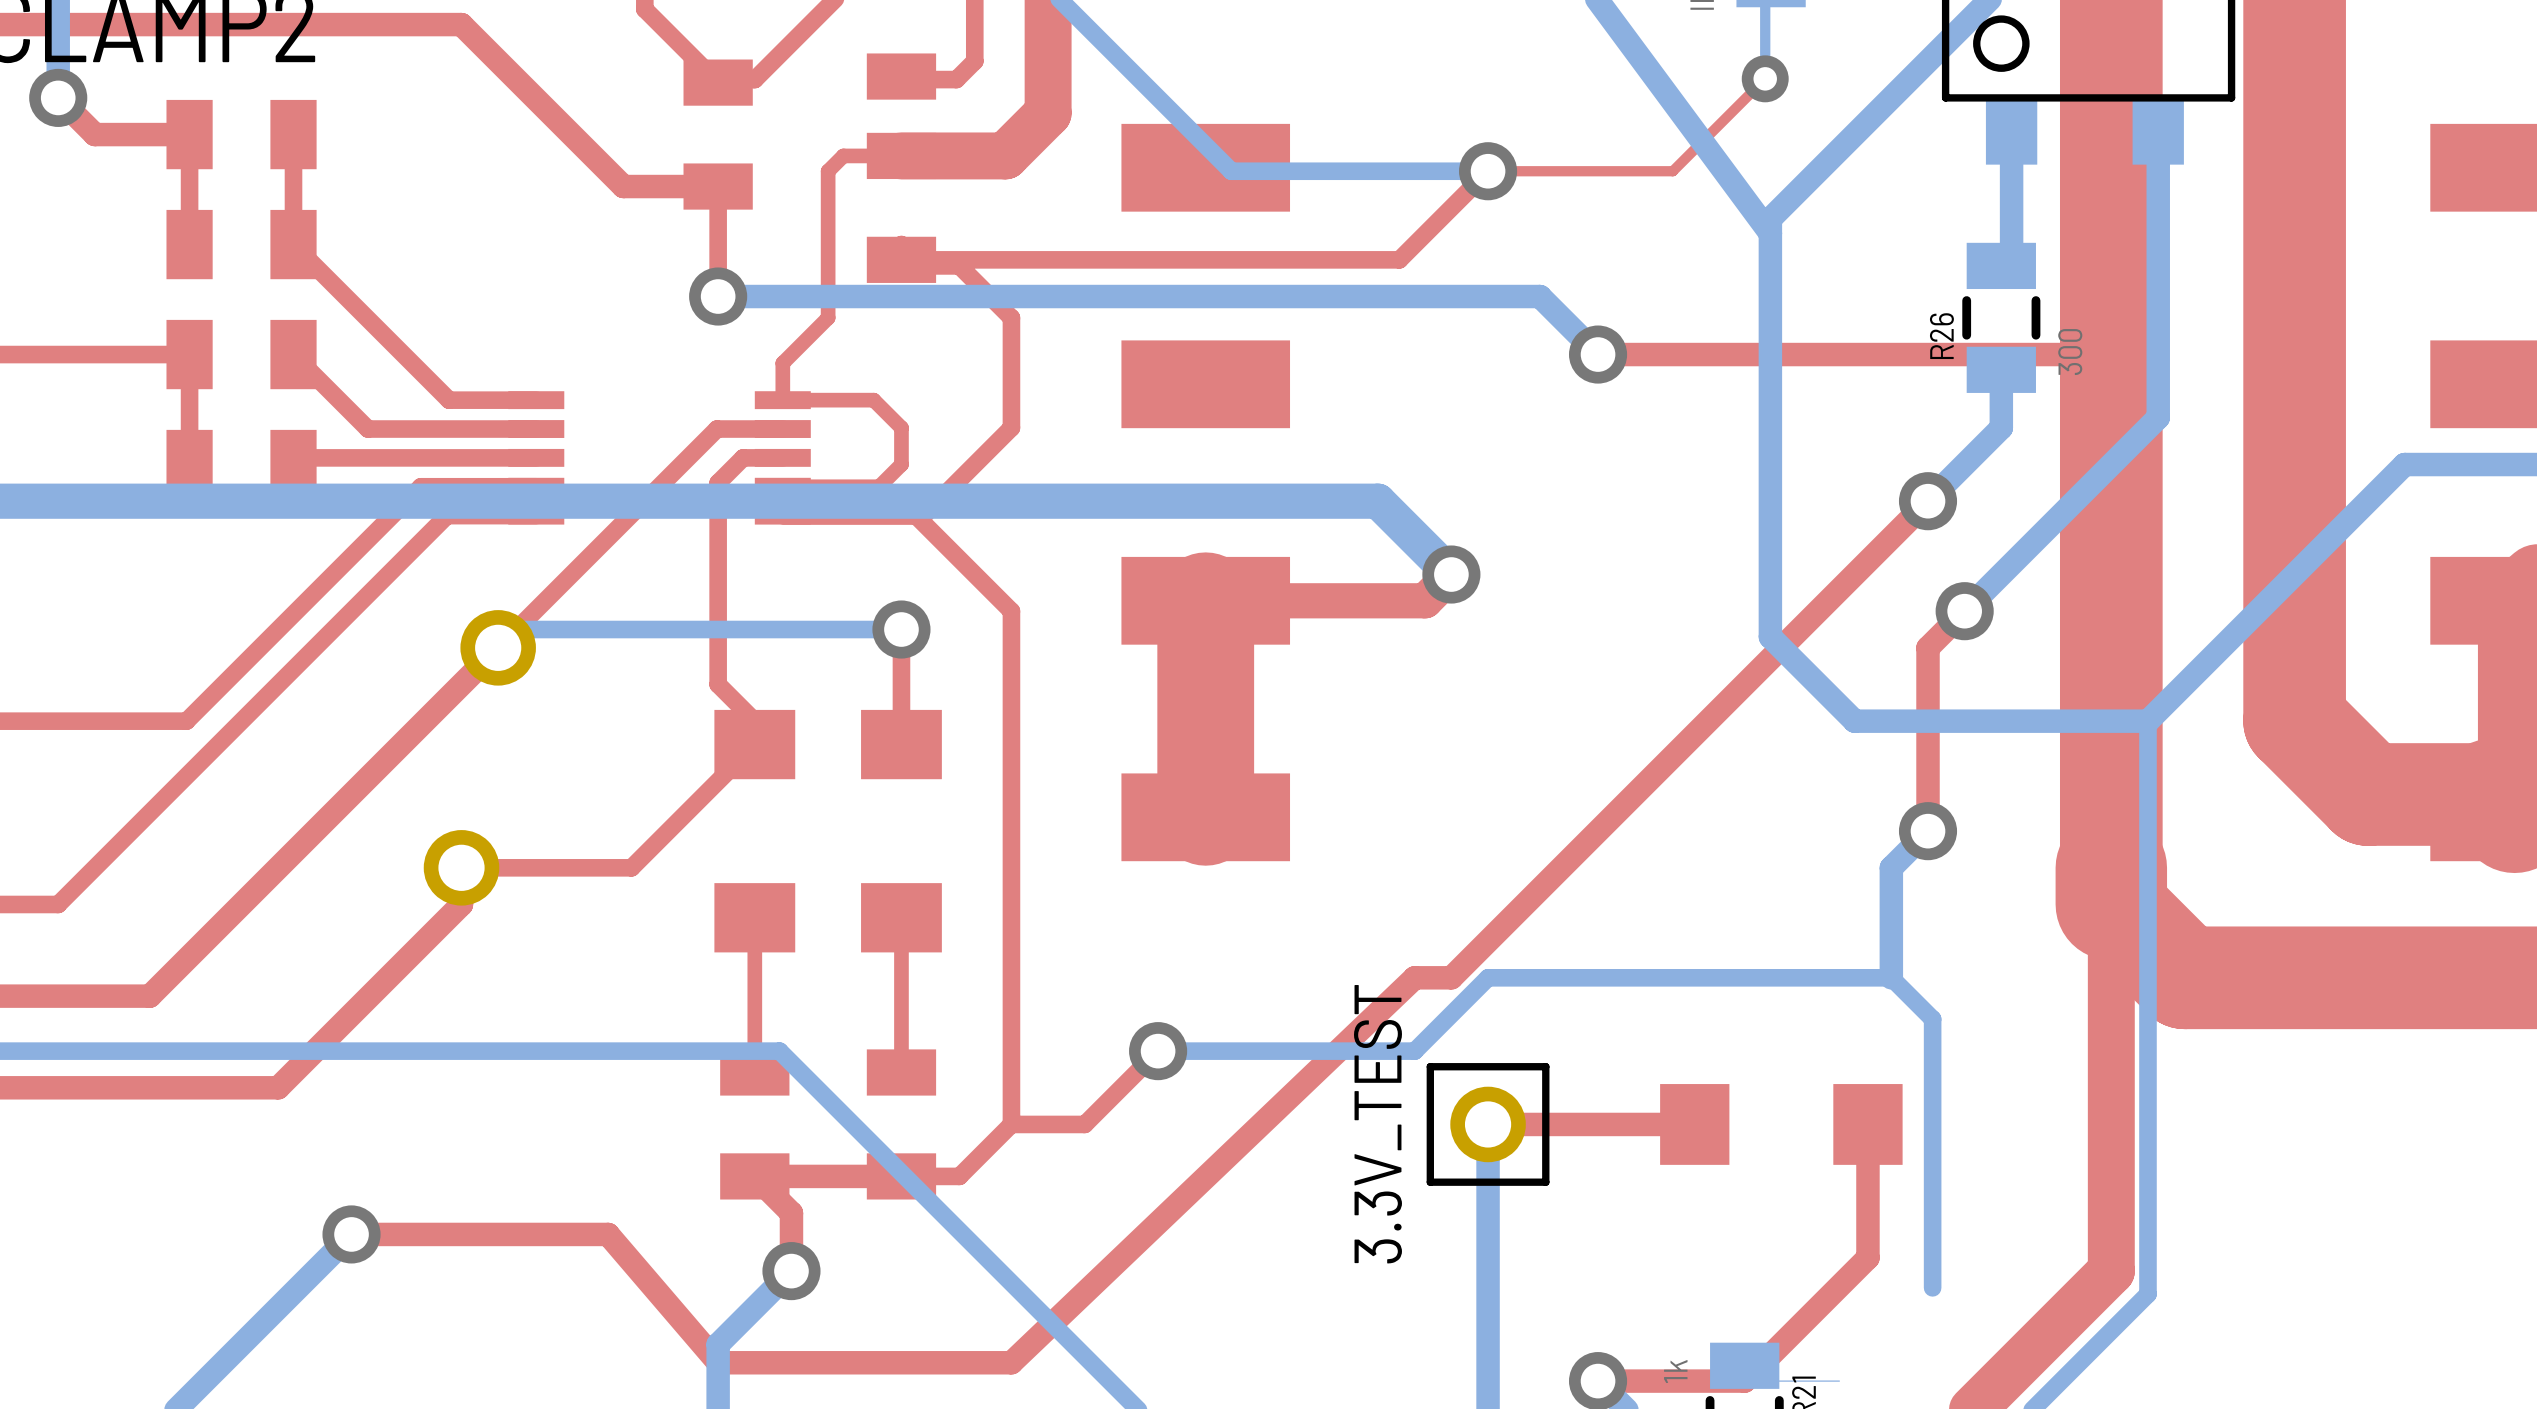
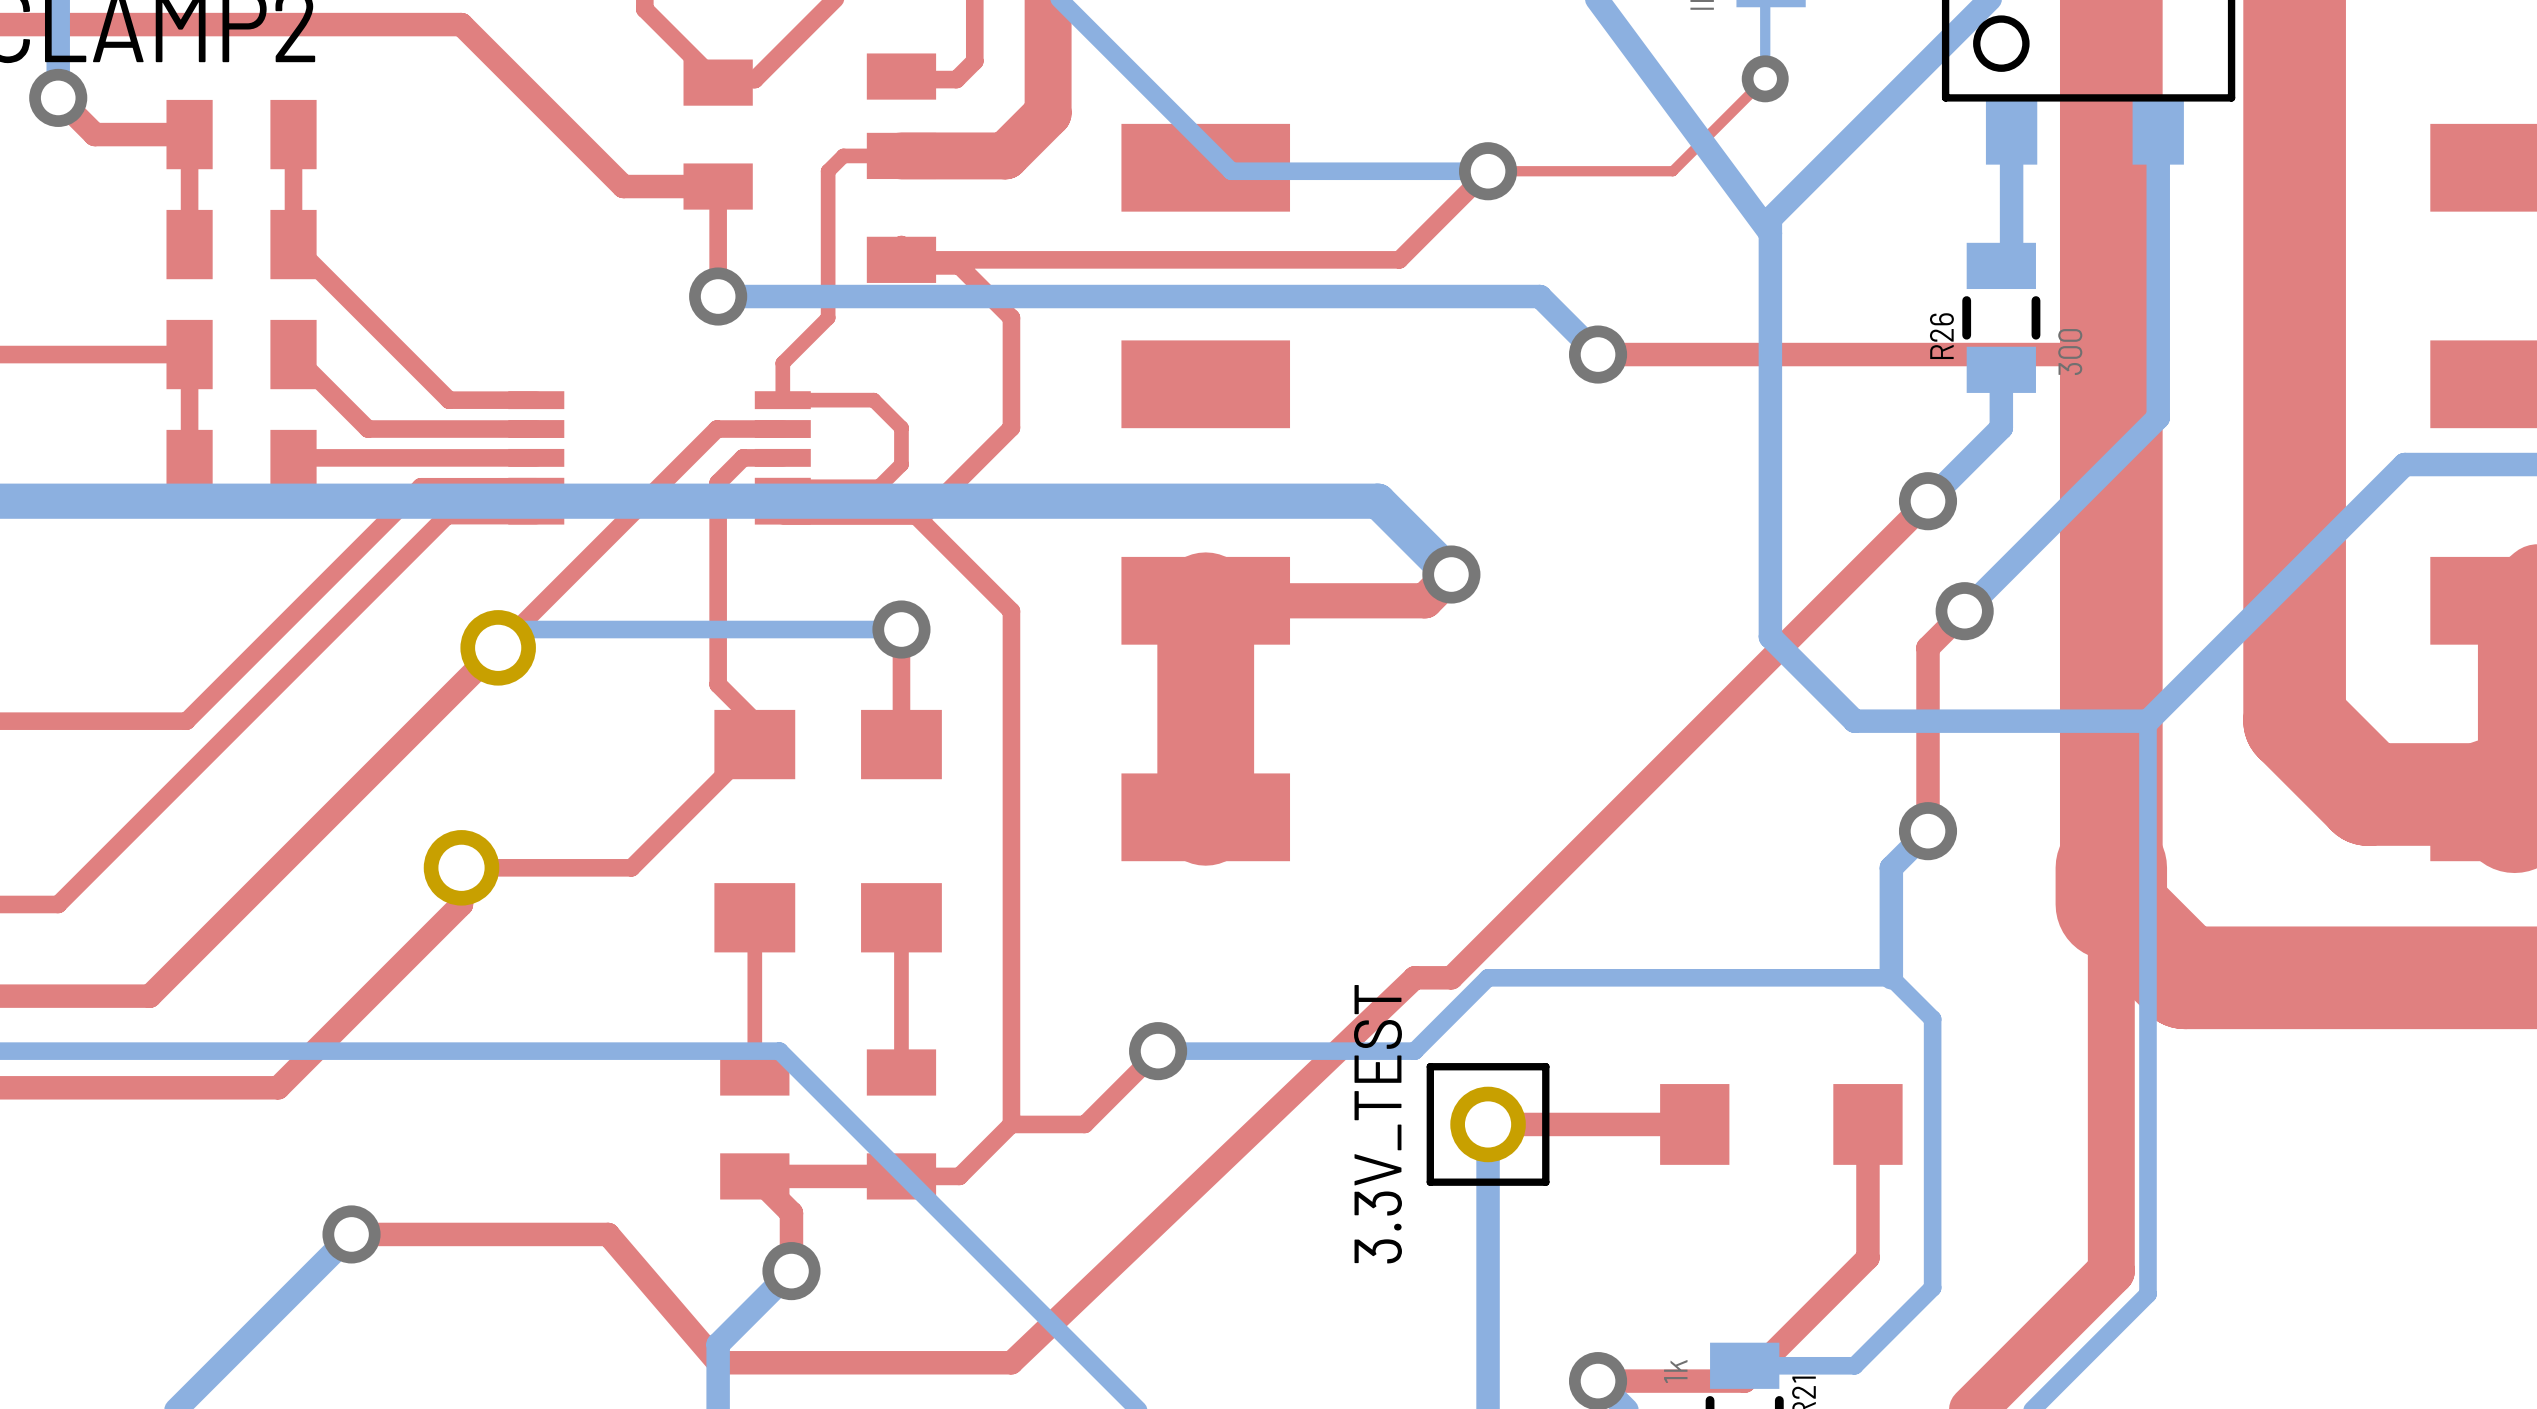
bottom track: none -> (1932, 1287) (1854, 1365) (1744, 1365)
bottom track: (1839, 1381) (1744, 1381) -> none

